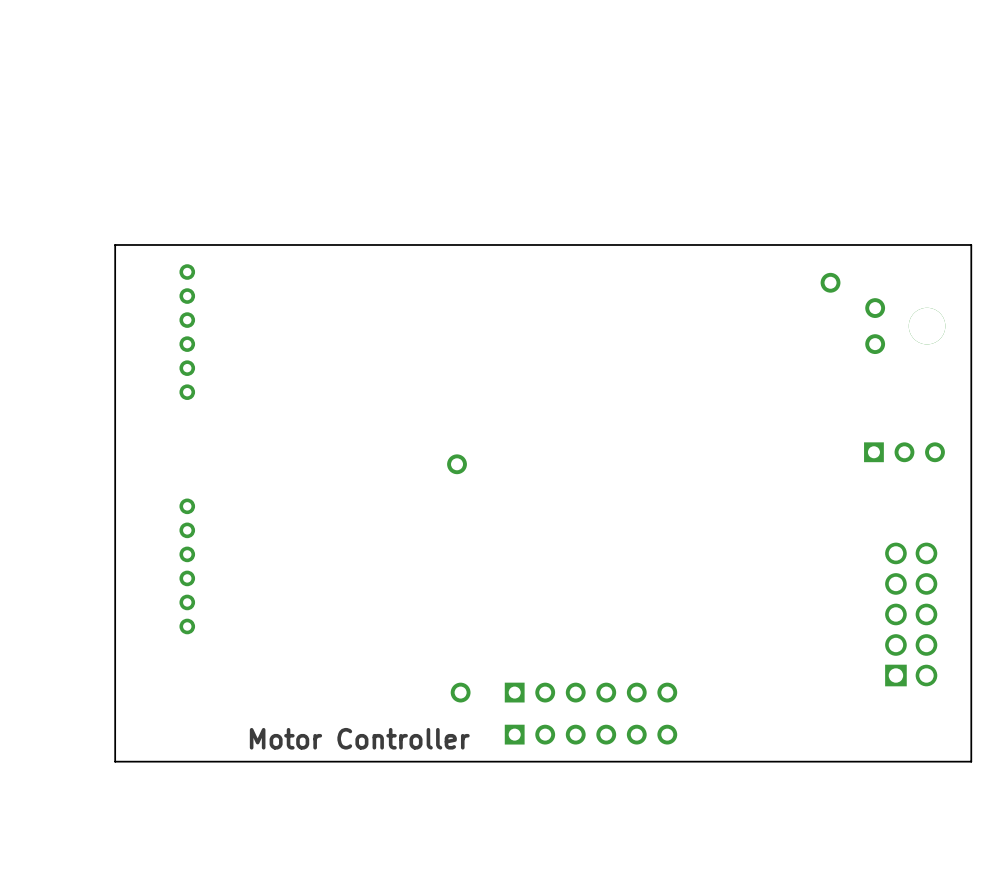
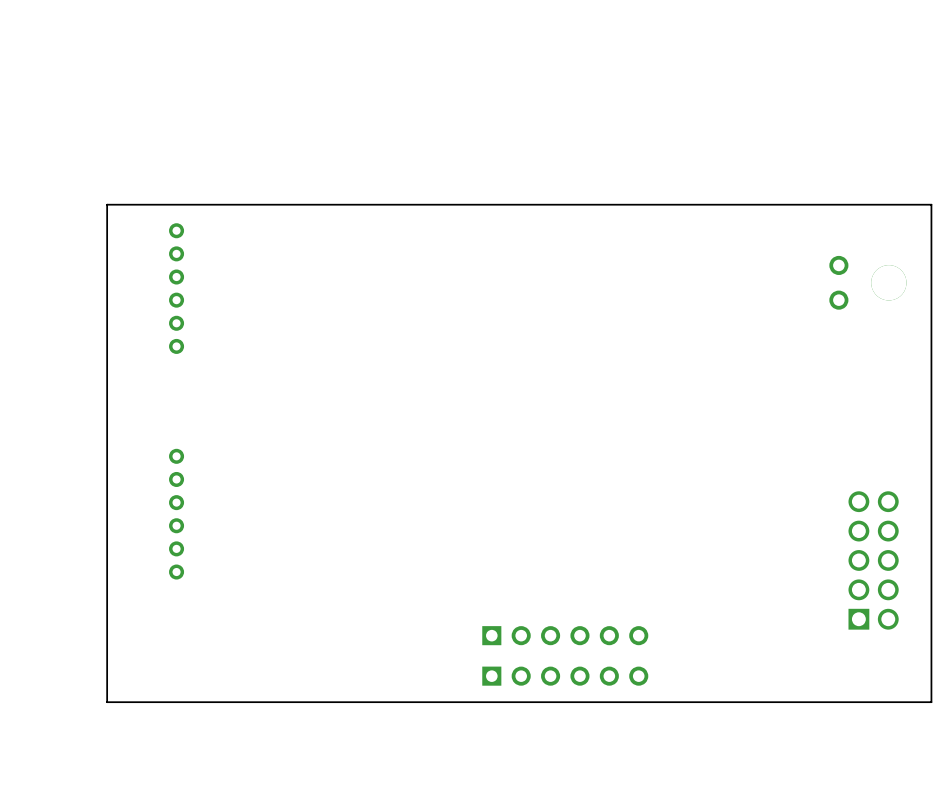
part: (830, 282) -> none
part: (904, 452) -> none
part: (457, 464) -> none
part: (460, 692) -> none
text: Motor Controller (359, 738) -> none

